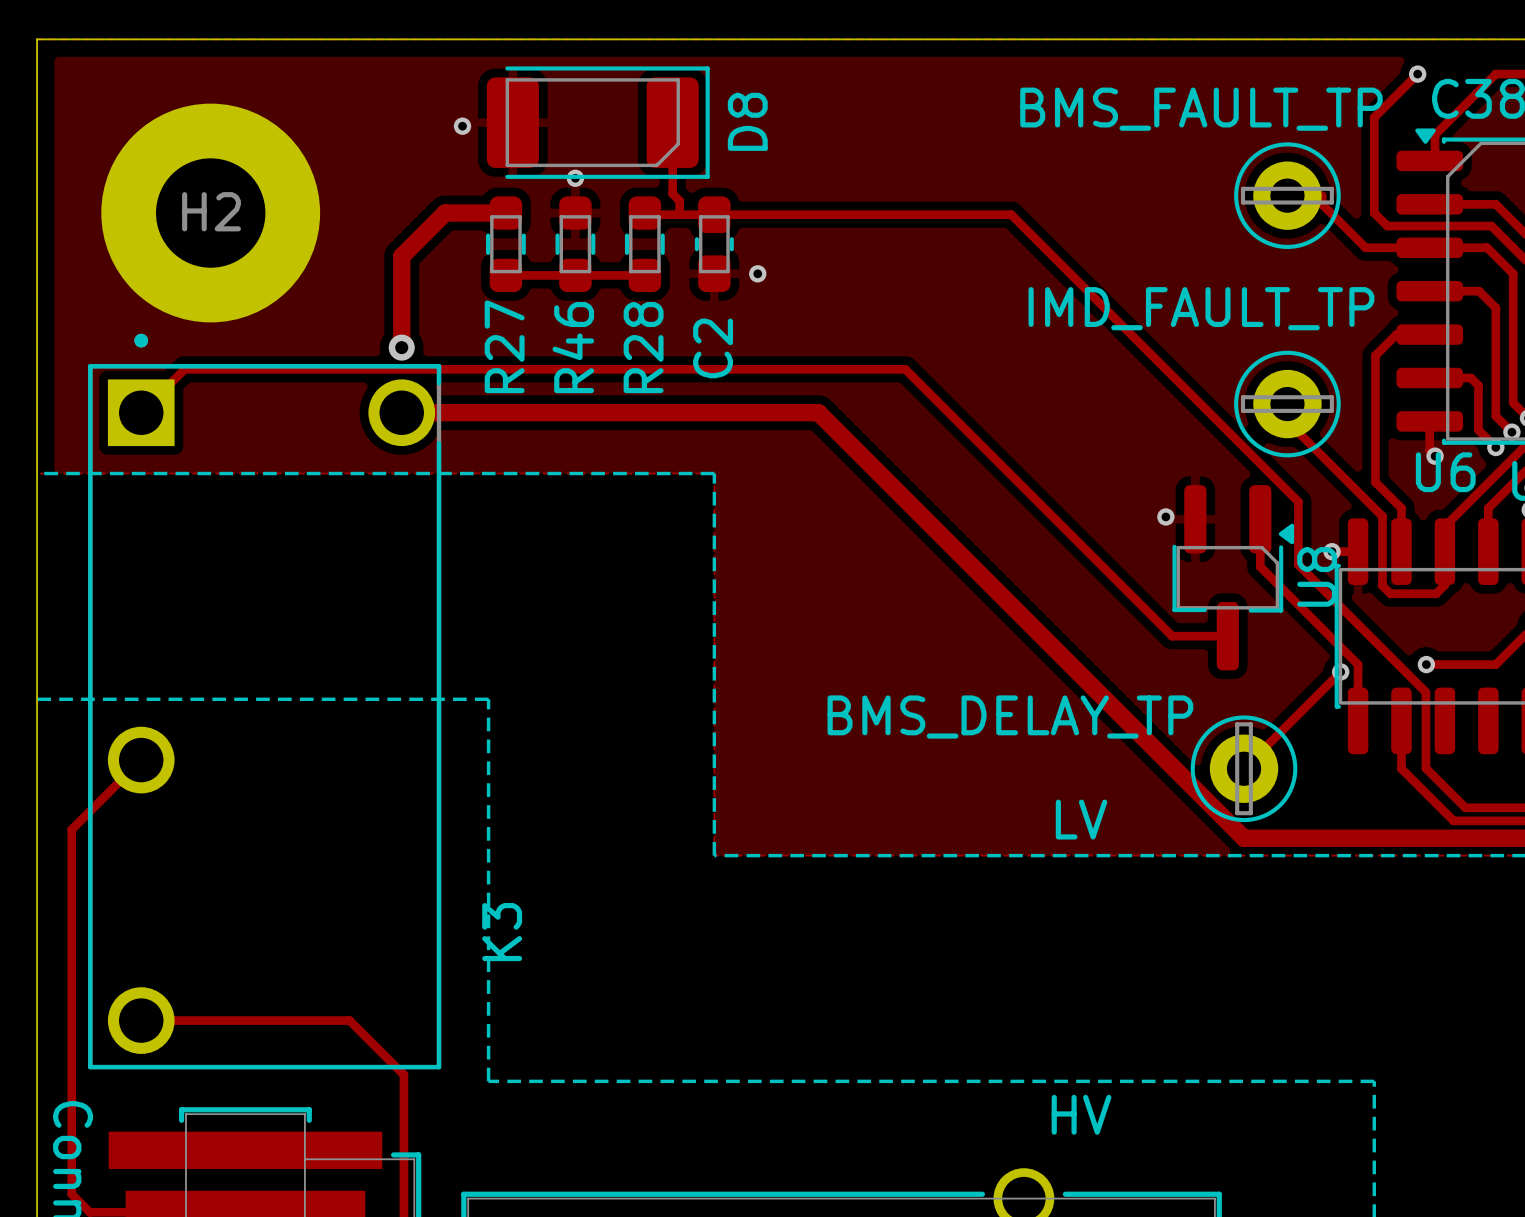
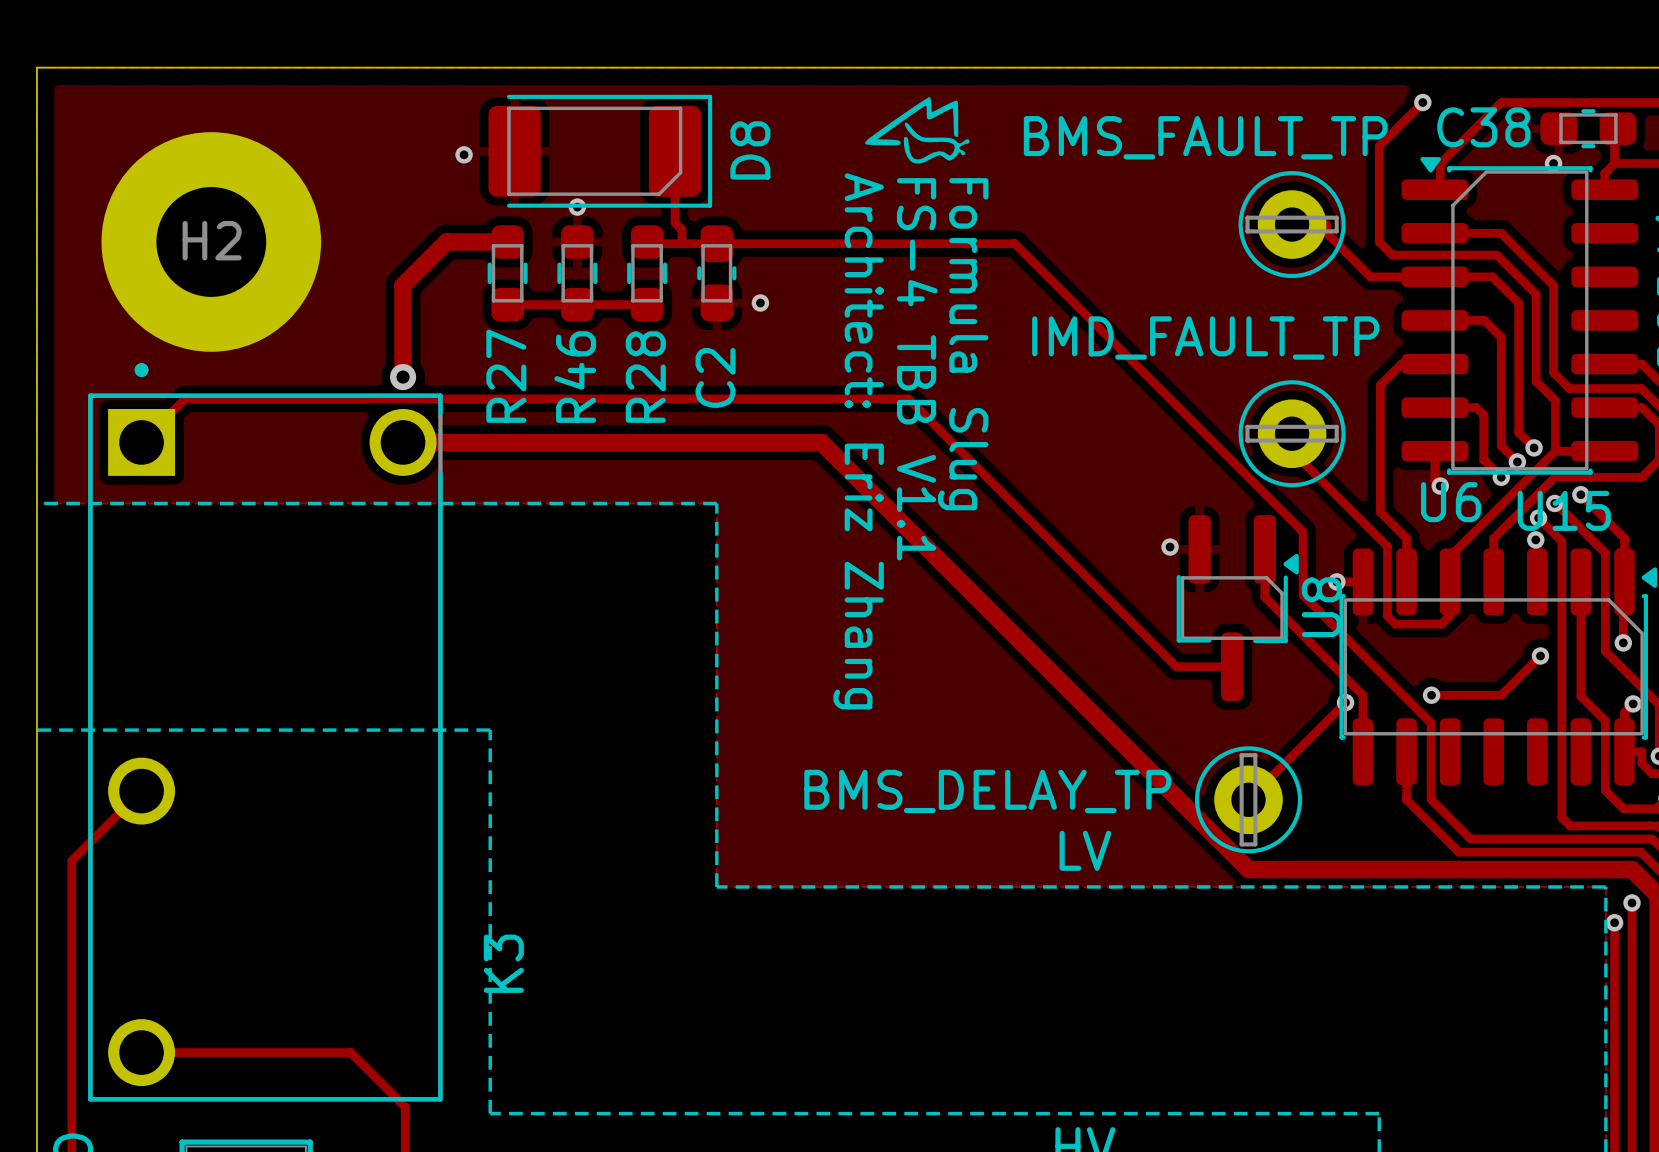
drawing: none -> [864, 97, 970, 164]
part value position: BMS_DELAY_TP (1010, 717) -> BMS_DELAY_TP (987, 791)

